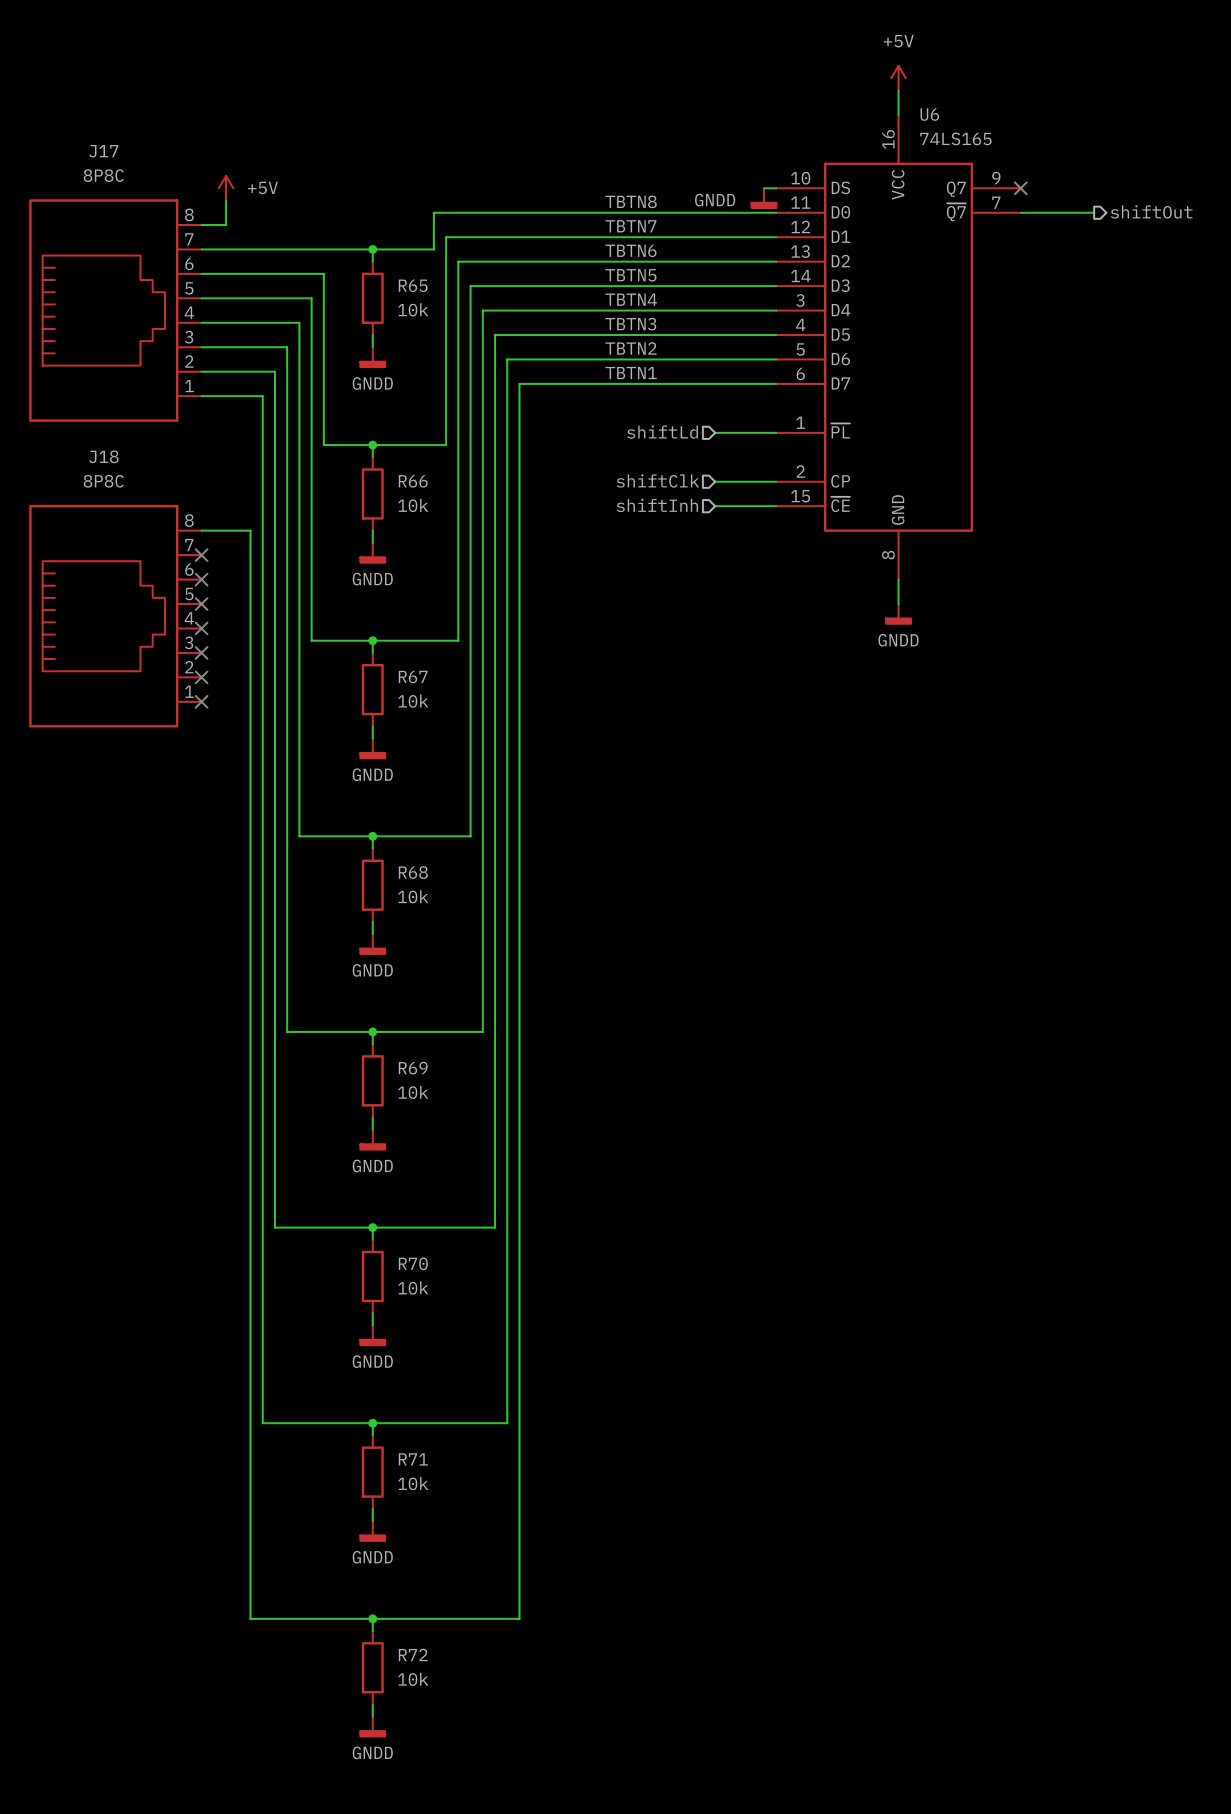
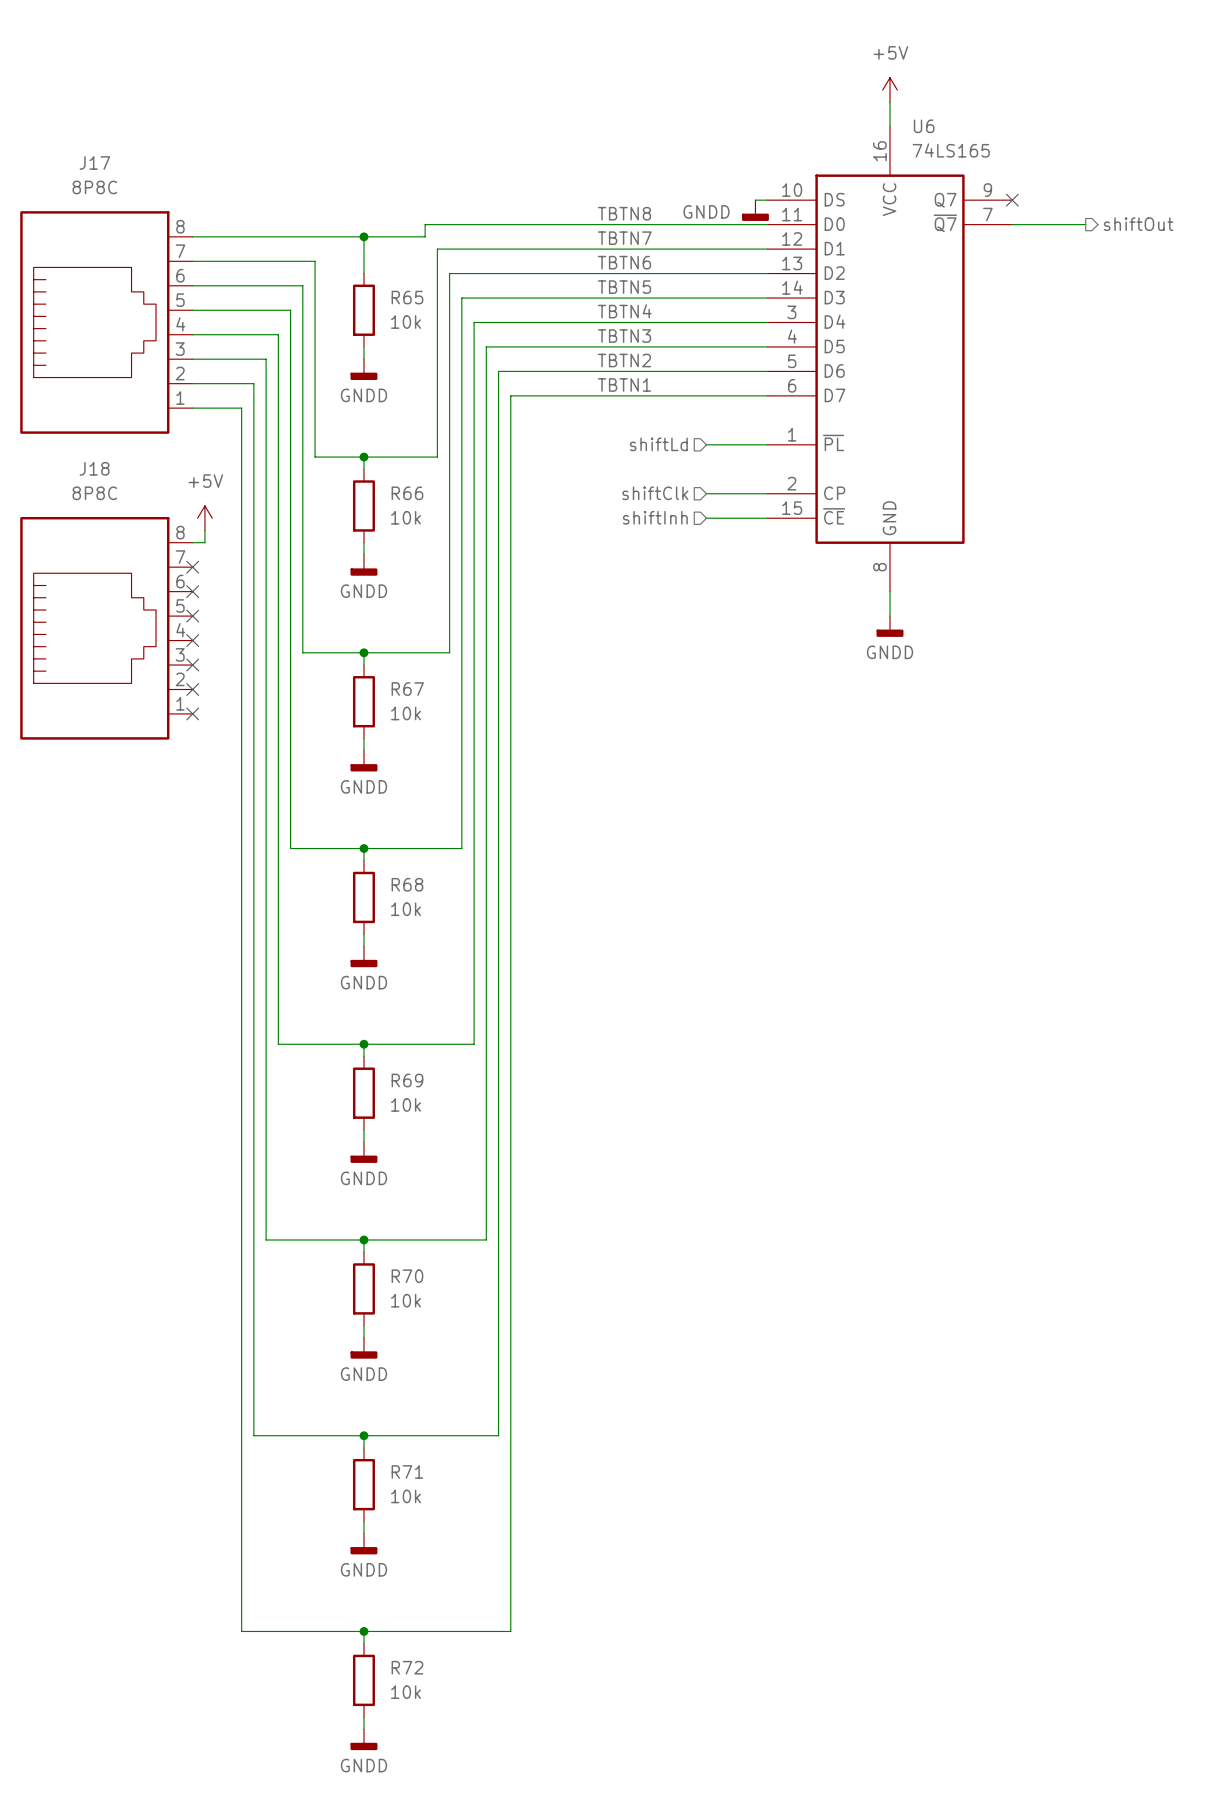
power symbol: +5V (226, 188) -> none
wire: (226, 200) (226, 224) -> (363, 236) (363, 261)
wire: (433, 224) (433, 249) (323, 249) -> (425, 236) (217, 236)
junction position: (372, 249) -> (363, 236)
wire: (311, 273) (323, 273) -> (315, 261) (315, 285)
wire: (299, 298) (311, 298) -> (302, 285) (302, 310)
wire: (287, 322) (299, 322) -> (290, 310) (290, 334)
wire: (274, 347) (287, 347) -> (278, 334) (278, 359)
wire: (262, 371) (274, 371) -> (266, 359) (266, 383)
wire: (250, 396) (262, 396) -> (253, 383) (253, 408)
wire: none -> (241, 408) (241, 542)
power symbol: none -> +5V (204, 518)
wire: (213, 530) (250, 530) -> (204, 542) (204, 530)

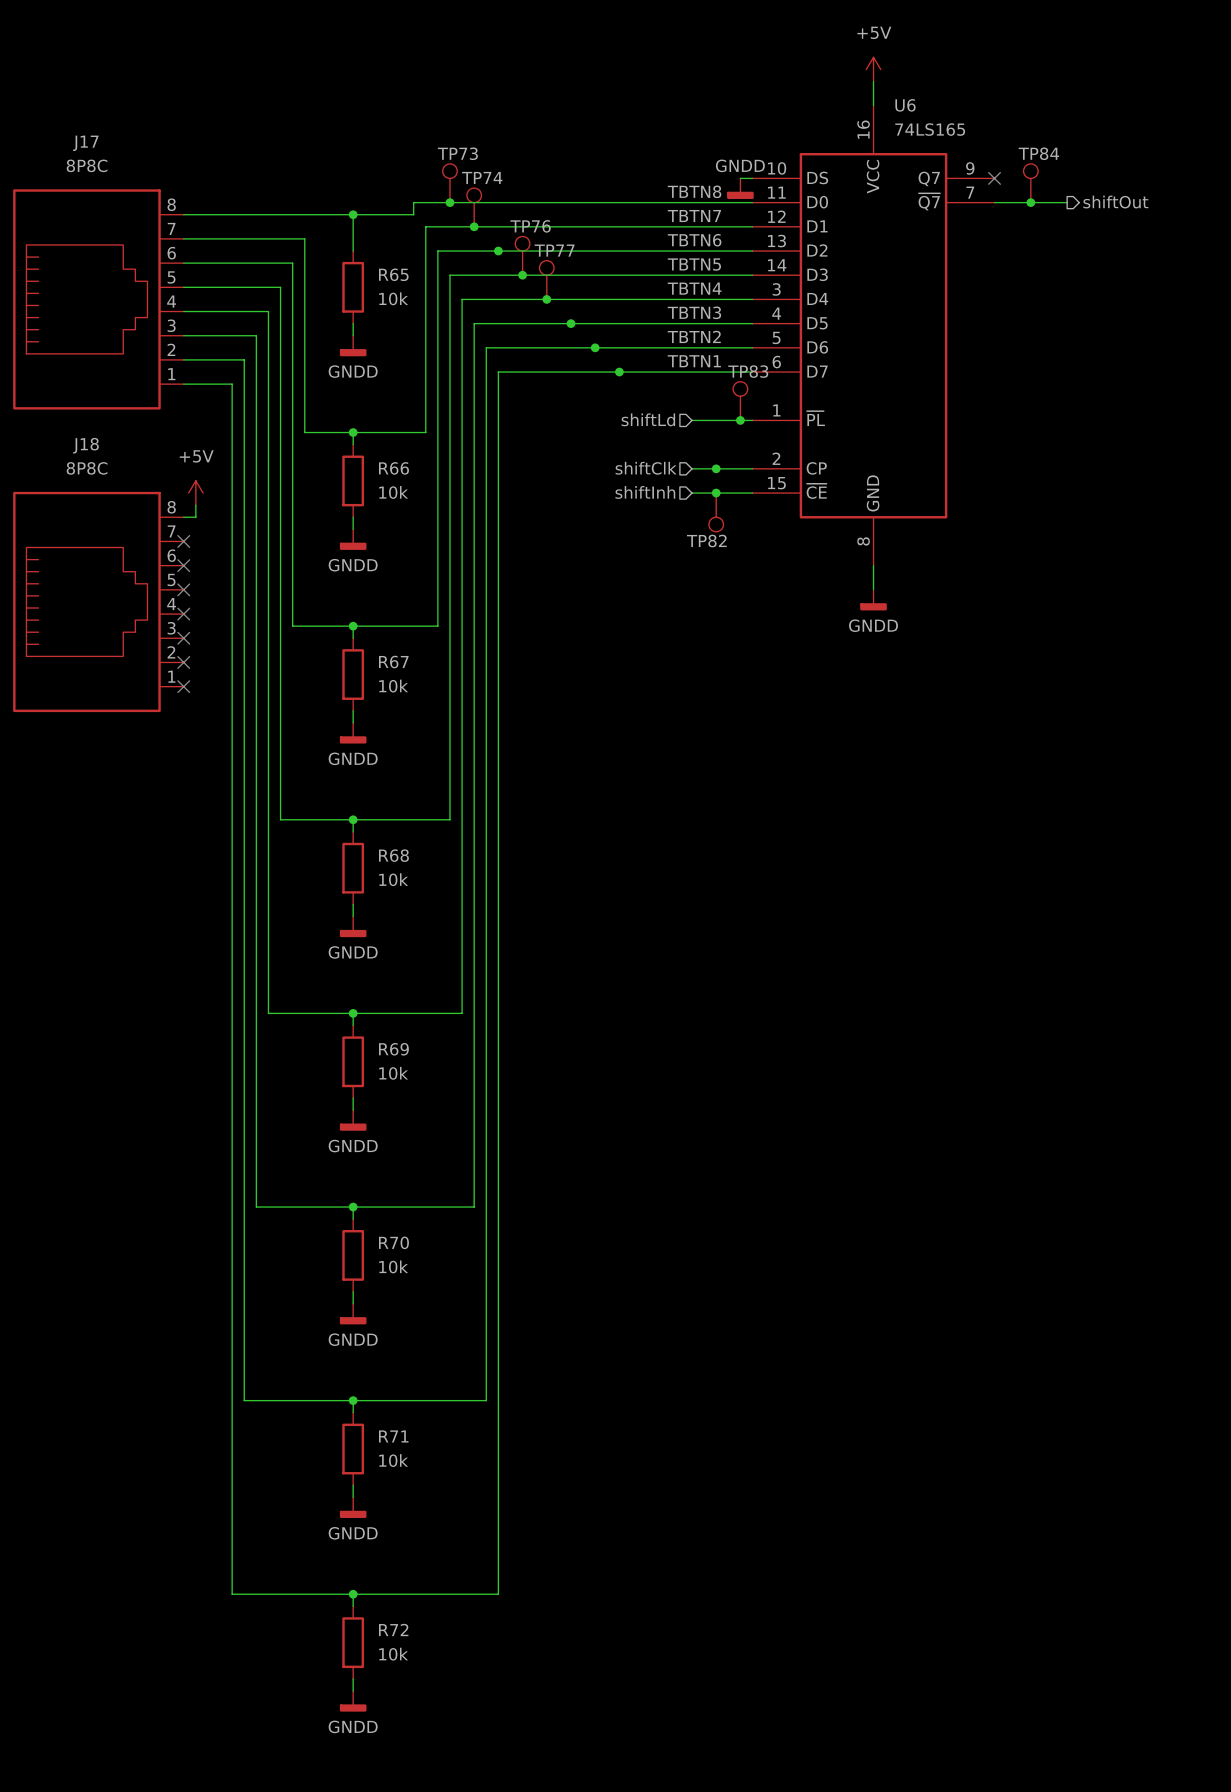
TP73: none -> (449, 183)
TP84: none -> (1030, 183)
power symbol text position: GNDD (706, 211) -> GNDD (740, 165)
label position: TBTN8 (624, 213) -> TBTN8 (694, 191)
junction: none -> (449, 202)
junction: none -> (1030, 202)
TP74: none -> (474, 207)
label position: TBTN7 (624, 238) -> TBTN7 (694, 216)
junction: none -> (474, 226)
label position: TBTN6 (624, 262) -> TBTN6 (694, 240)
junction: none -> (498, 251)
TP76: none -> (522, 255)
label position: TBTN5 (624, 287) -> TBTN5 (694, 264)
junction: none -> (522, 275)
TP77: none -> (546, 280)
label position: TBTN4 (624, 311) -> TBTN4 (694, 288)
junction: none -> (546, 299)
label position: TBTN3 (624, 336) -> TBTN3 (694, 312)
junction: none -> (570, 323)
label position: TBTN2 (624, 360) -> TBTN2 (694, 336)
junction: none -> (595, 347)
label position: TBTN1 (624, 384) -> TBTN1 (694, 361)
junction: none -> (619, 372)
TP83: none -> (740, 401)
junction: none -> (740, 420)
junction: none -> (716, 468)
junction: none -> (716, 493)
TP82: none -> (716, 512)

